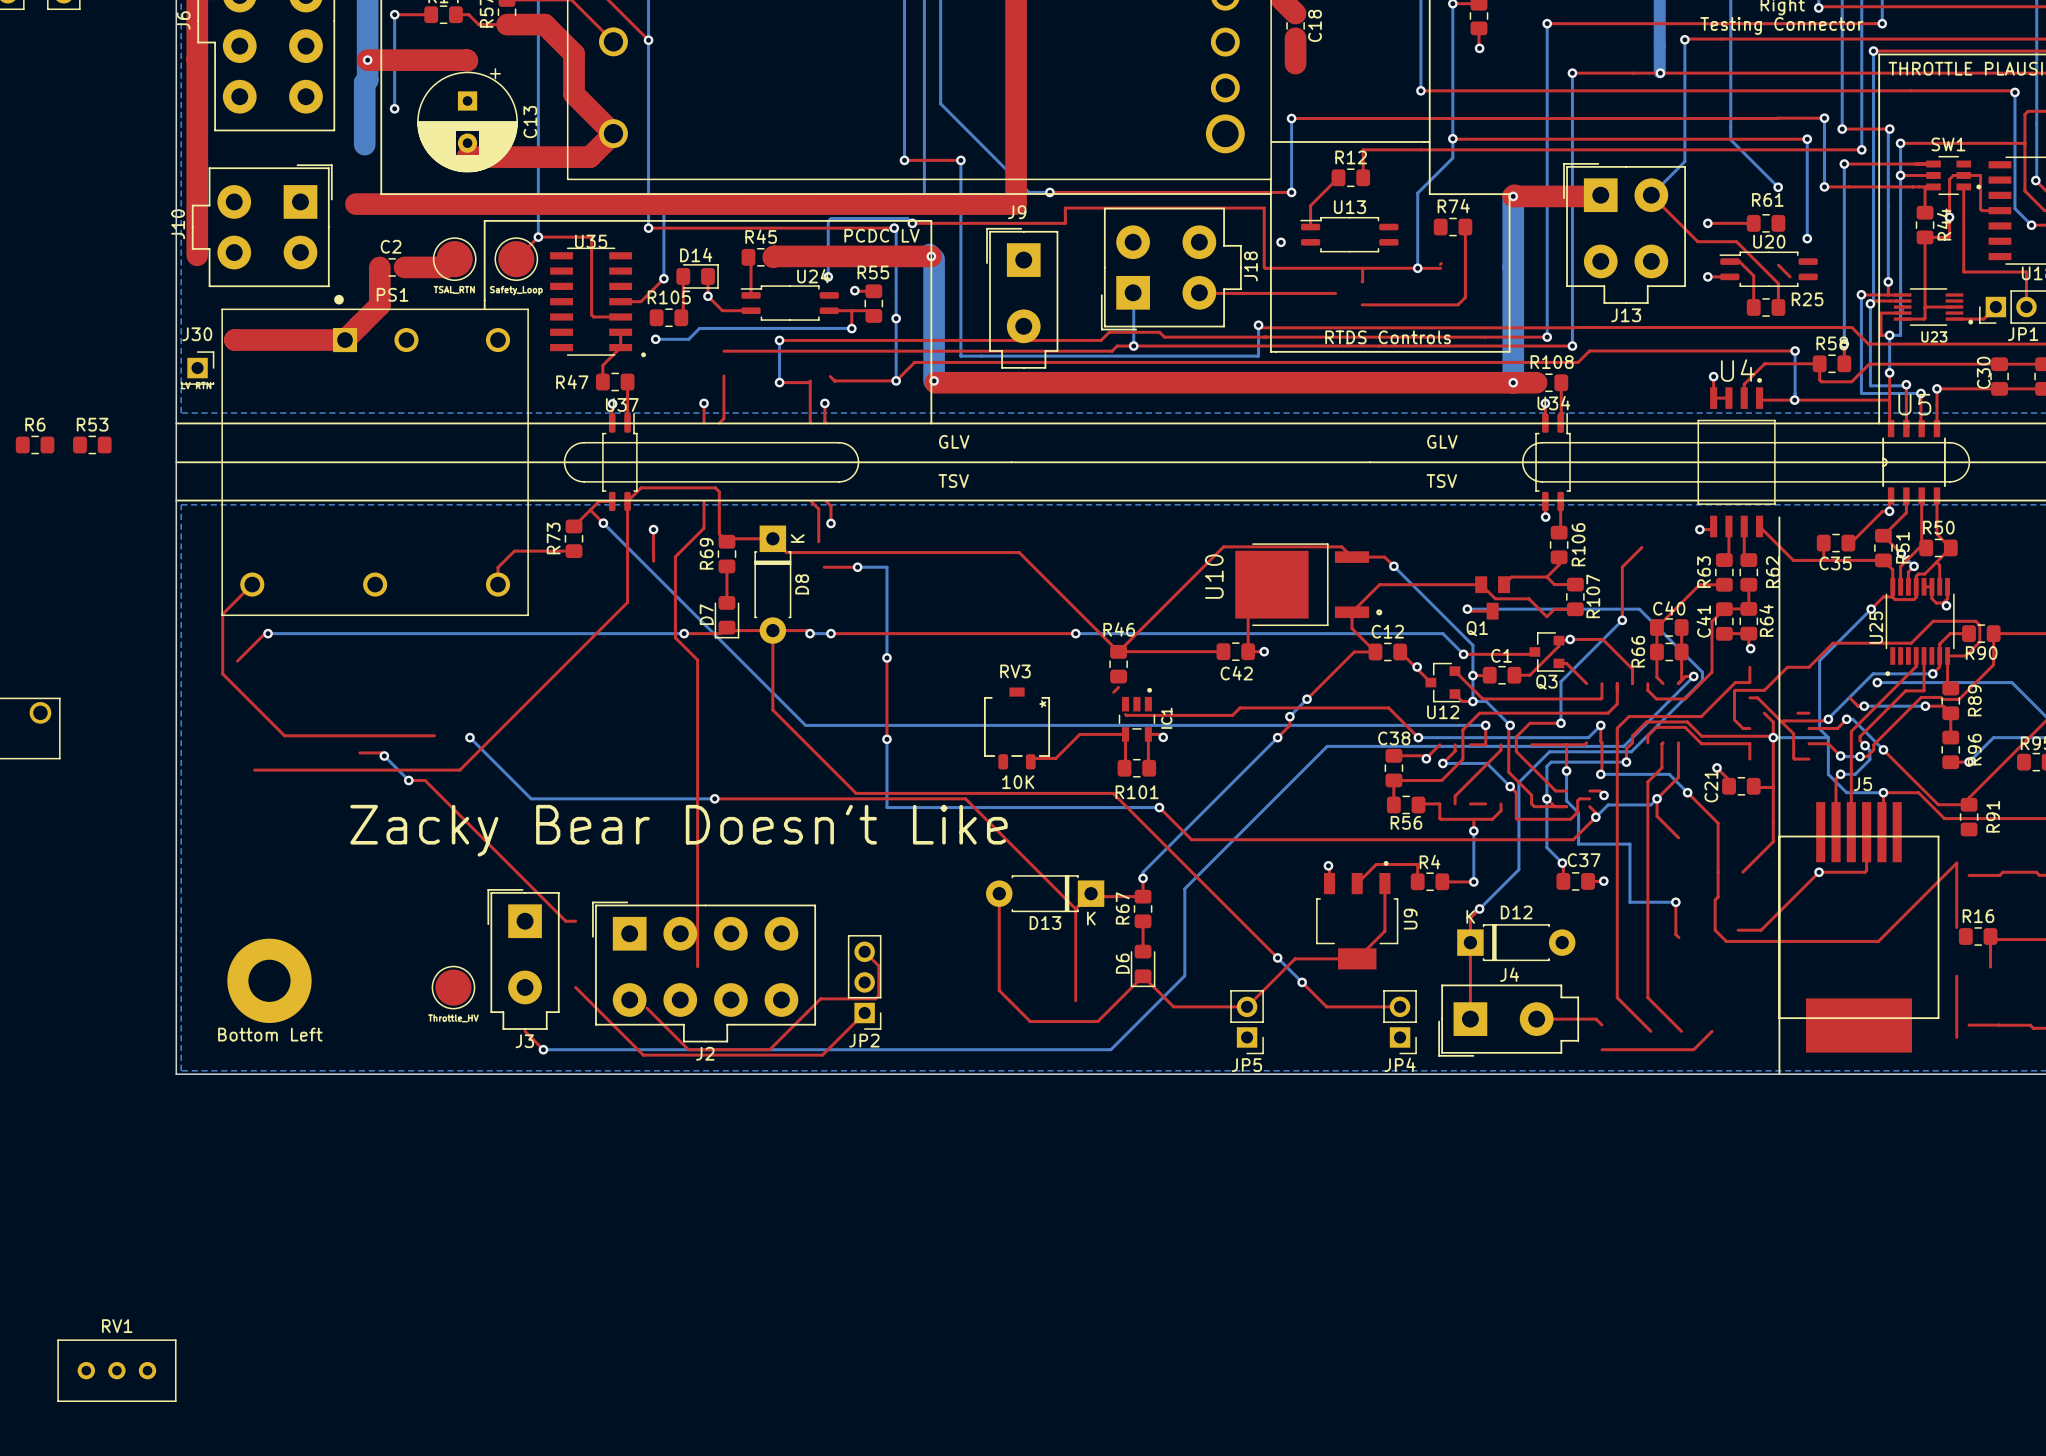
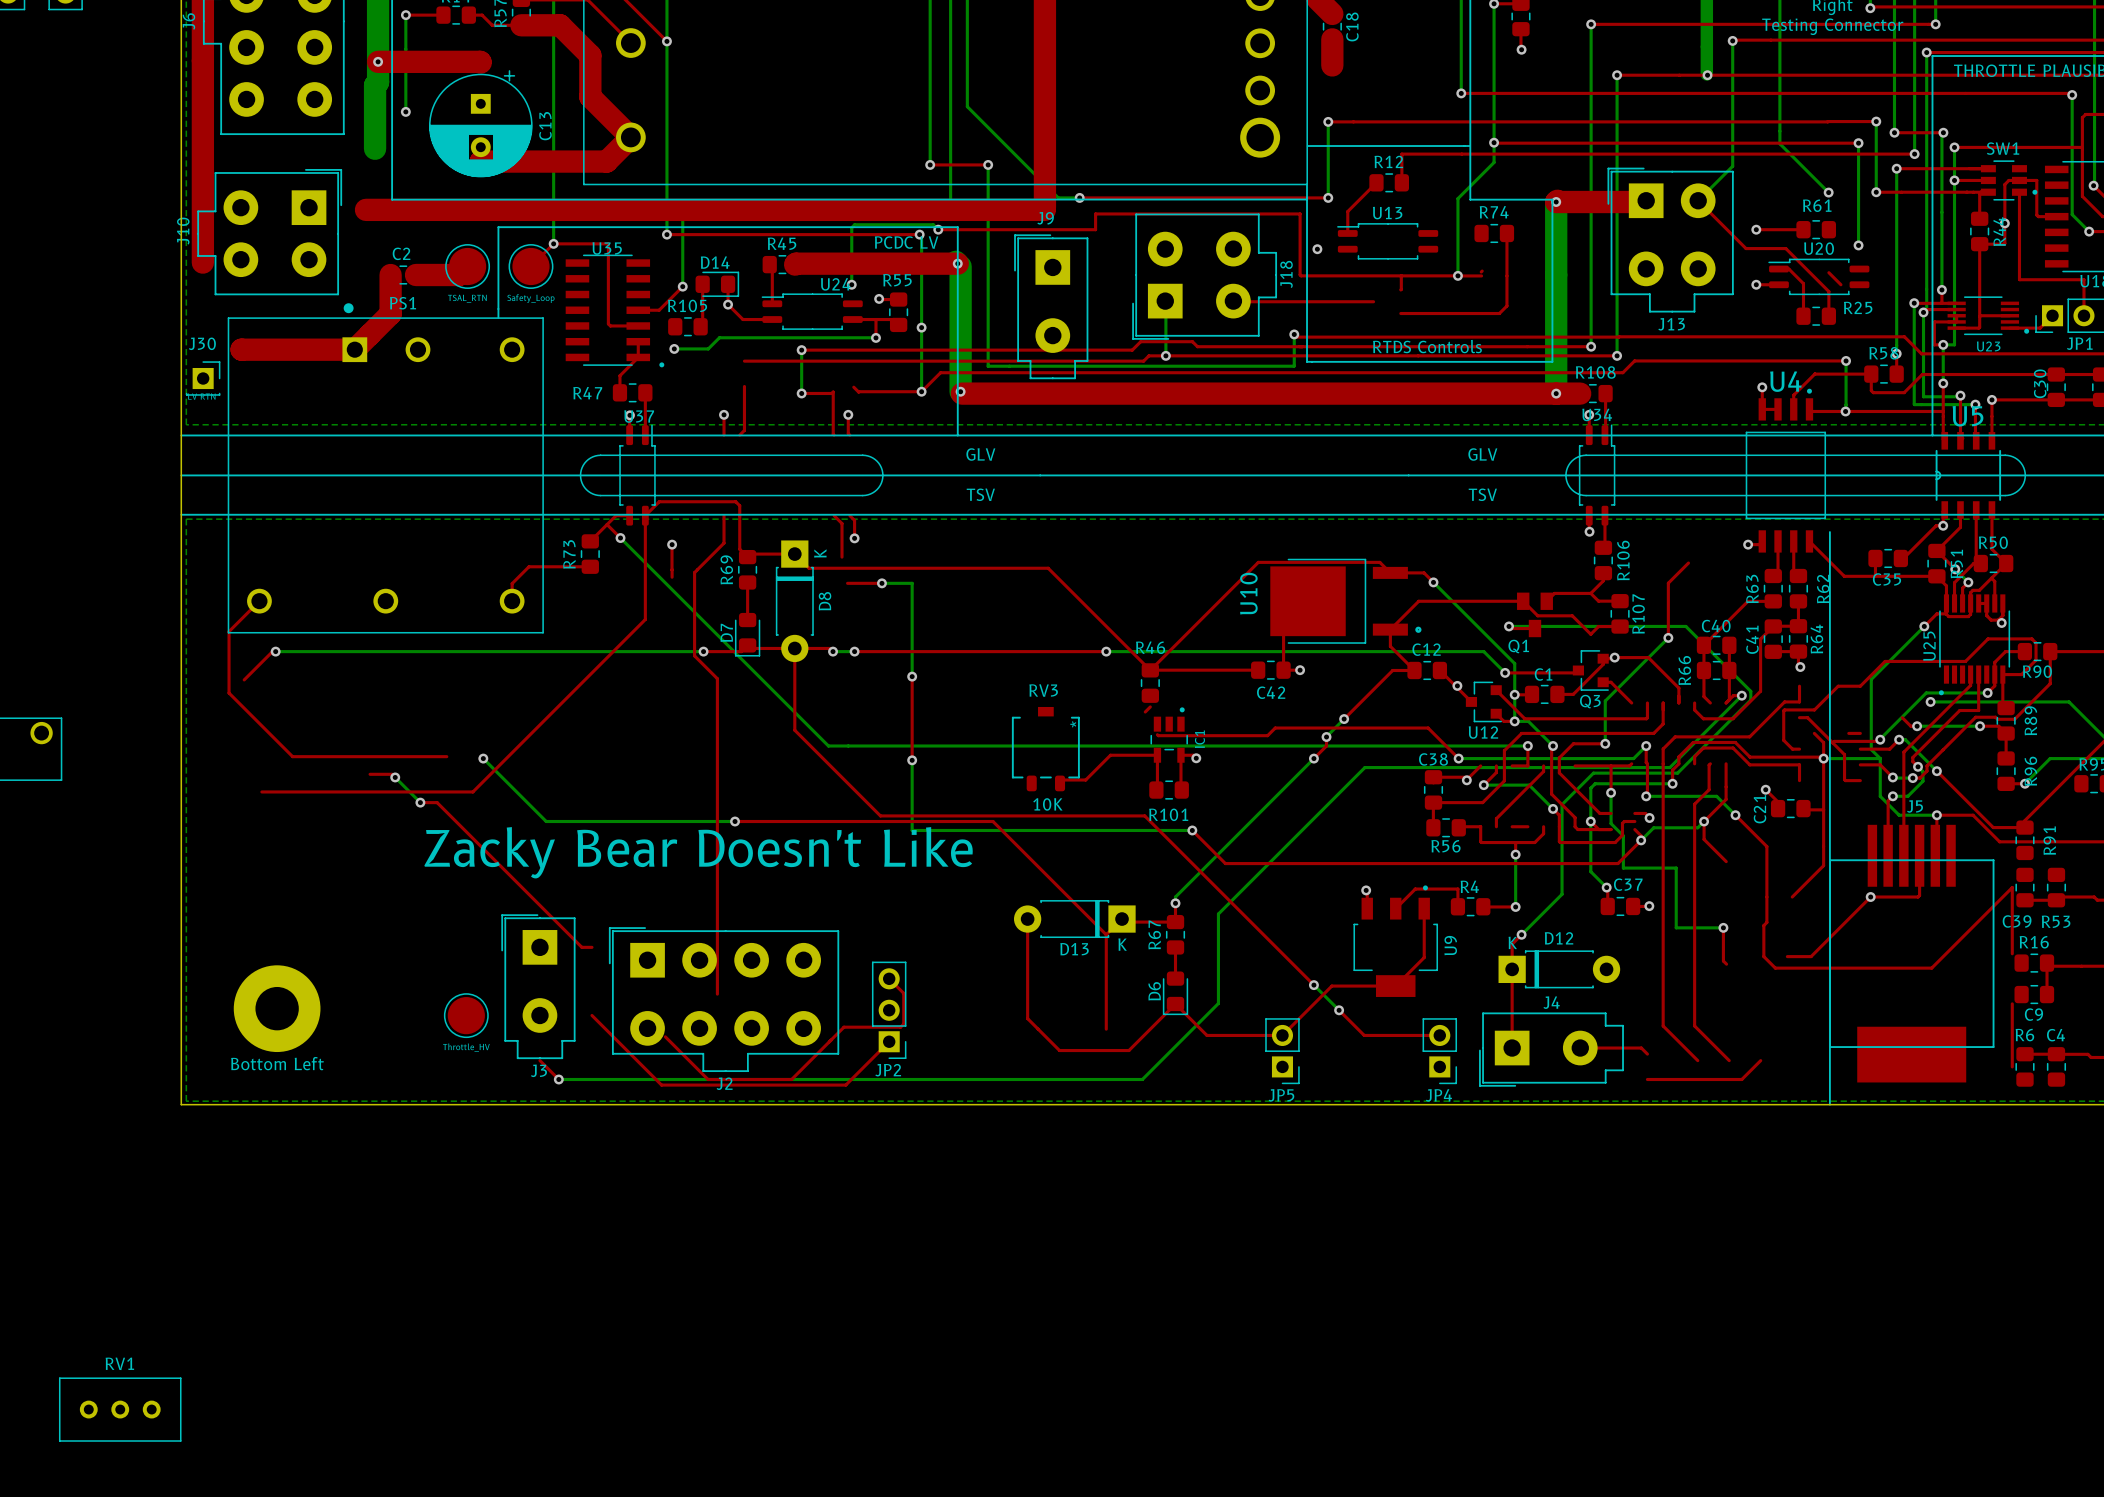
R53 name position: R53 (92, 424) -> R53 (2056, 921)
R6 rotation: 0° (35, 444) -> 90° clockwise (2024, 1066)
R6 position: (35, 444) -> (2024, 1066)
R53 rotation: 0° (92, 444) -> 90° clockwise (2056, 887)
R53 position: (92, 444) -> (2056, 887)
C39: none -> (2024, 887)
C9: none -> (2034, 994)
C4: none -> (2056, 1066)

